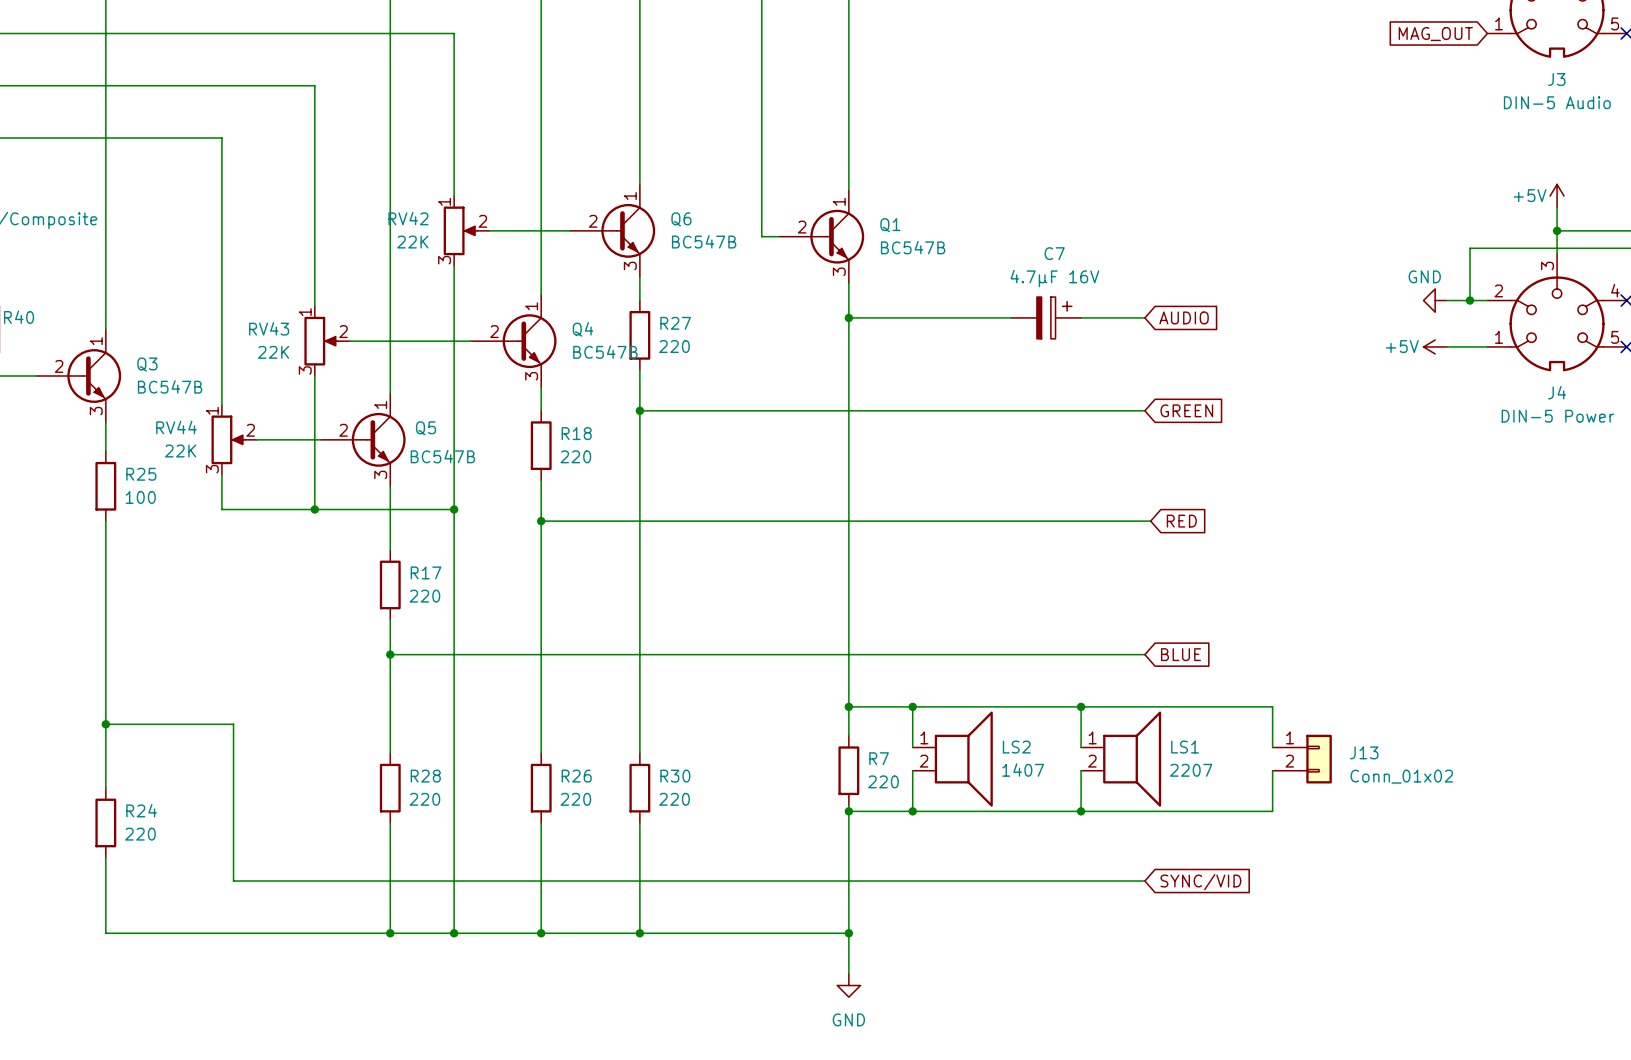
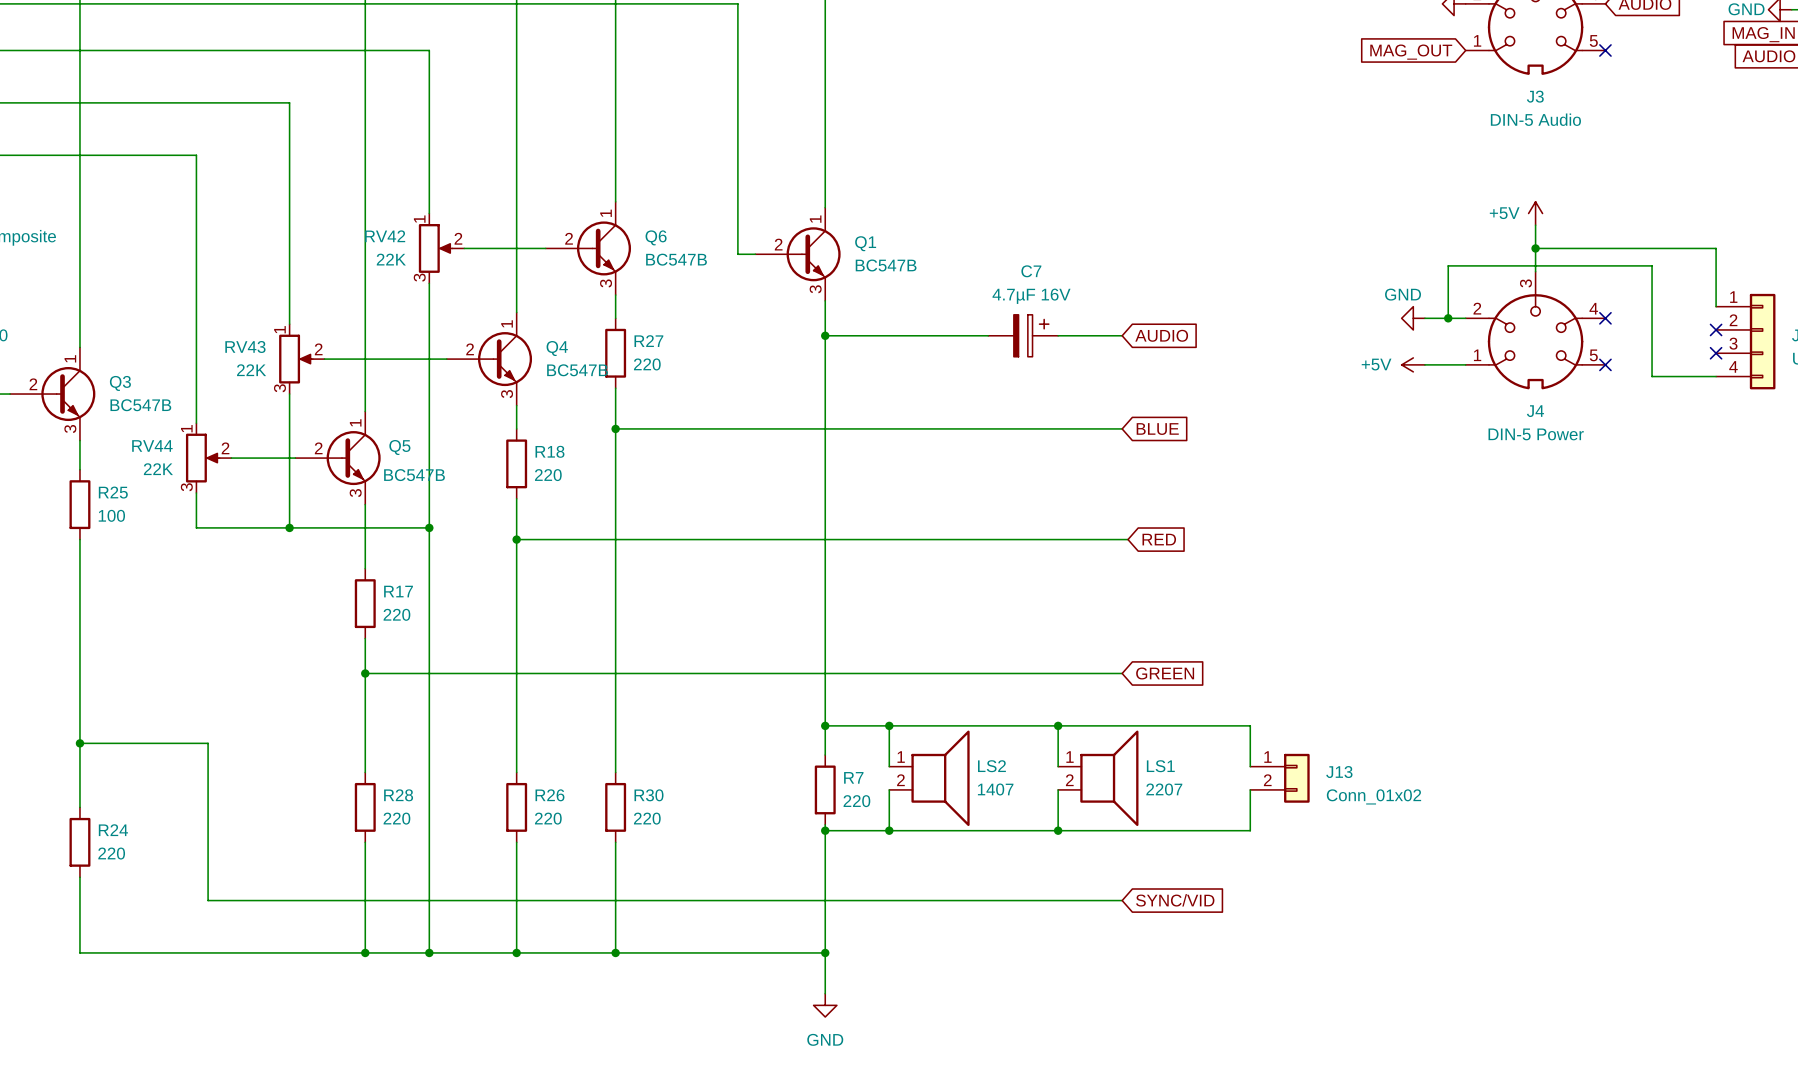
global label: GREEN (1186, 410) -> BLUE (1157, 429)
global label: BLUE (1181, 654) -> GREEN (1165, 673)

